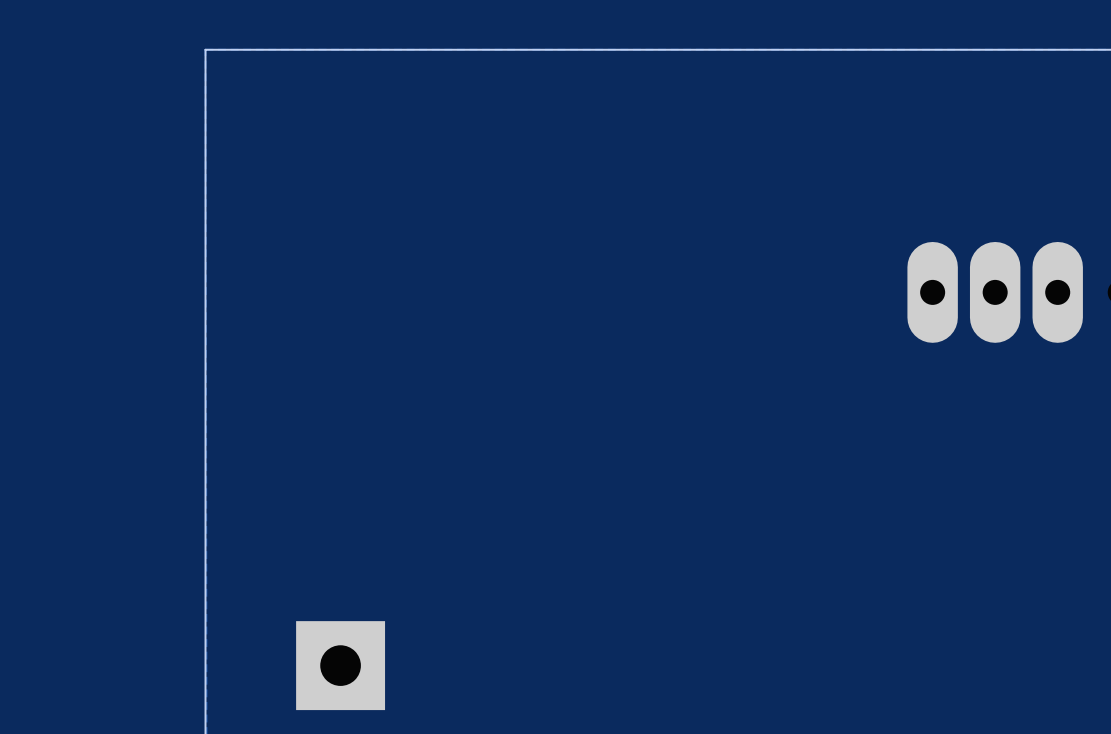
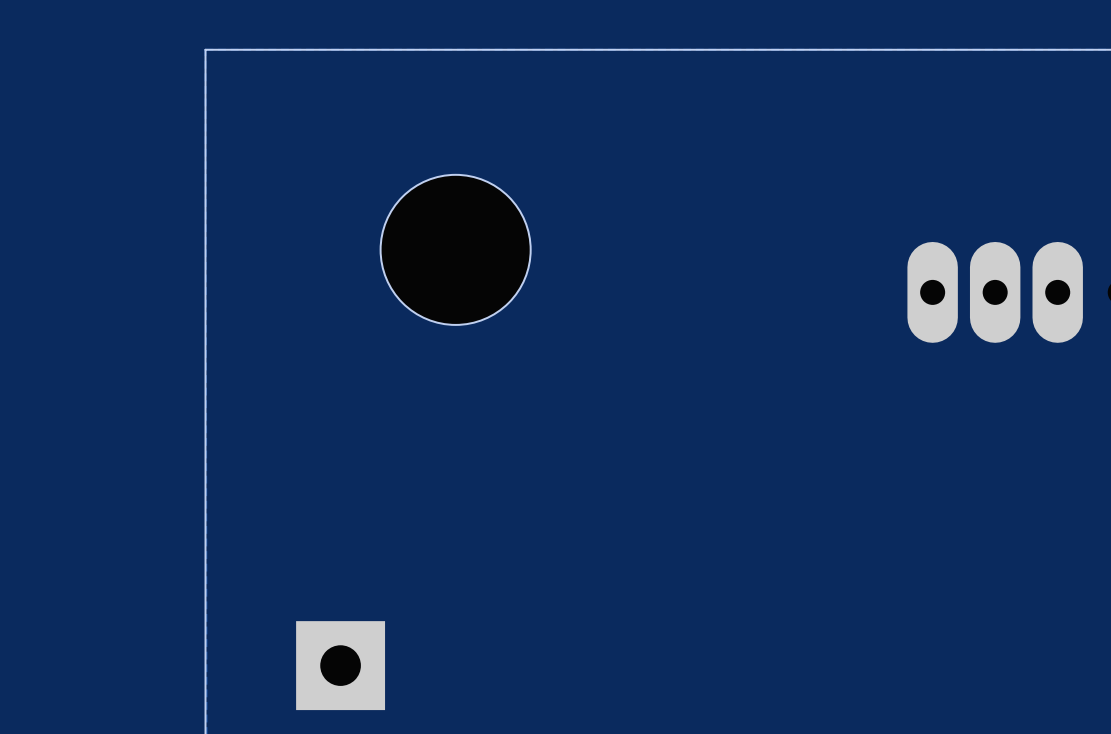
hole: none -> (455, 249)

